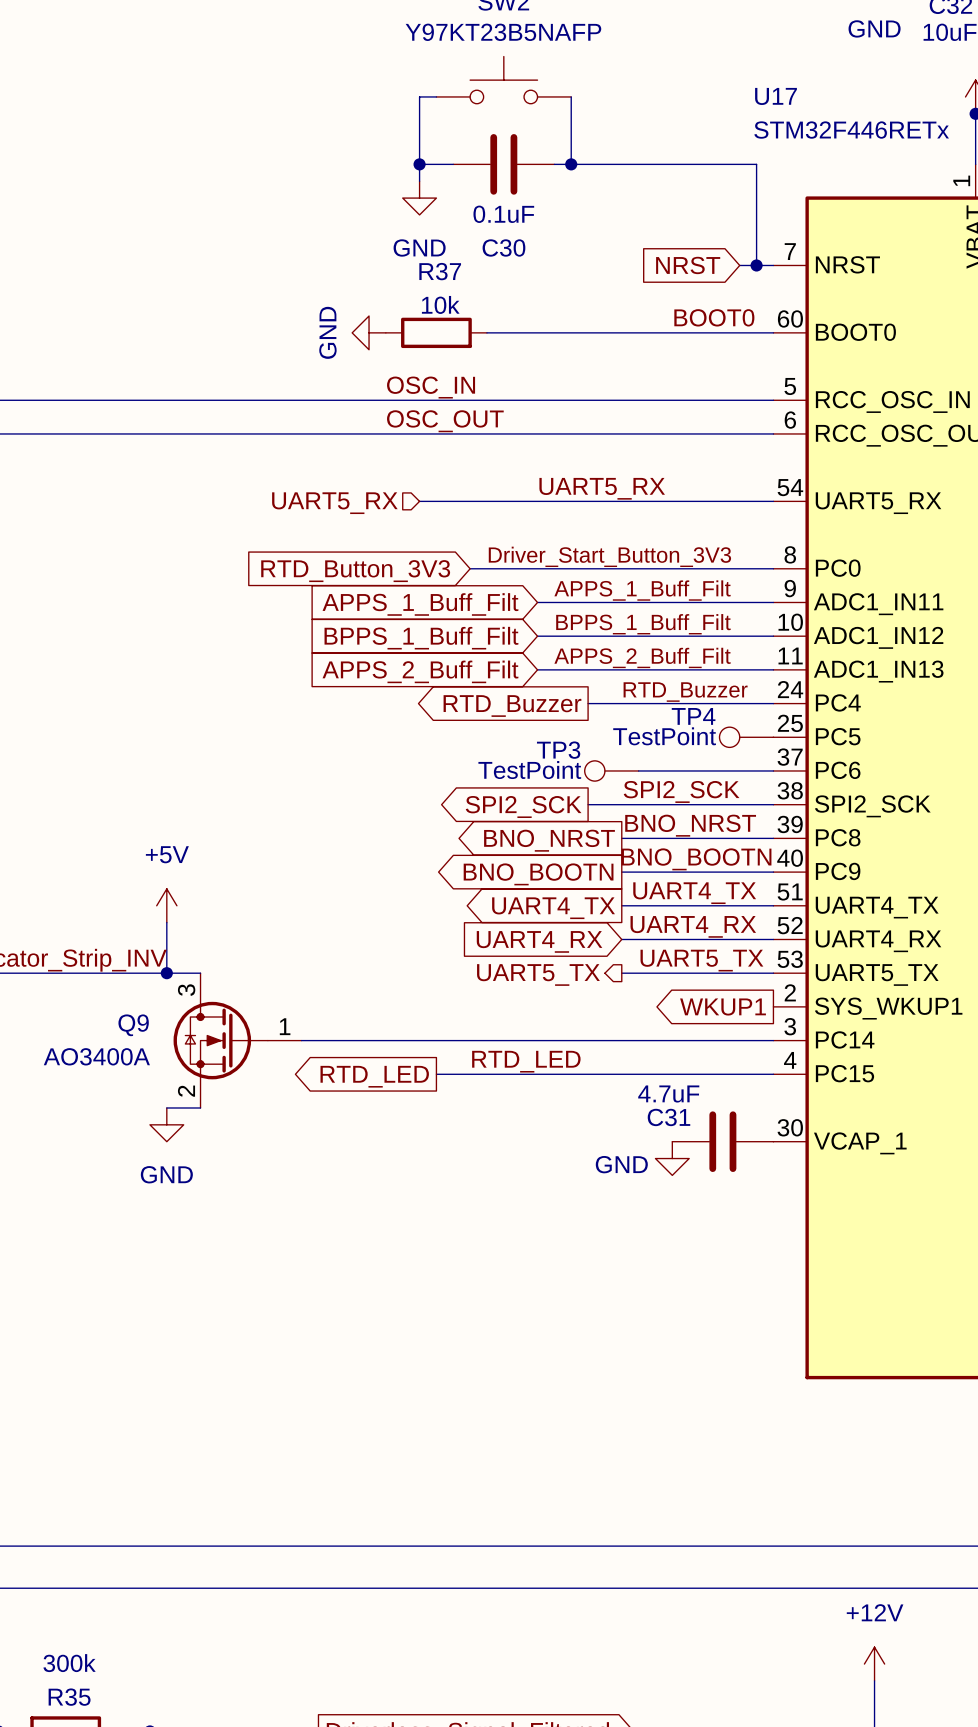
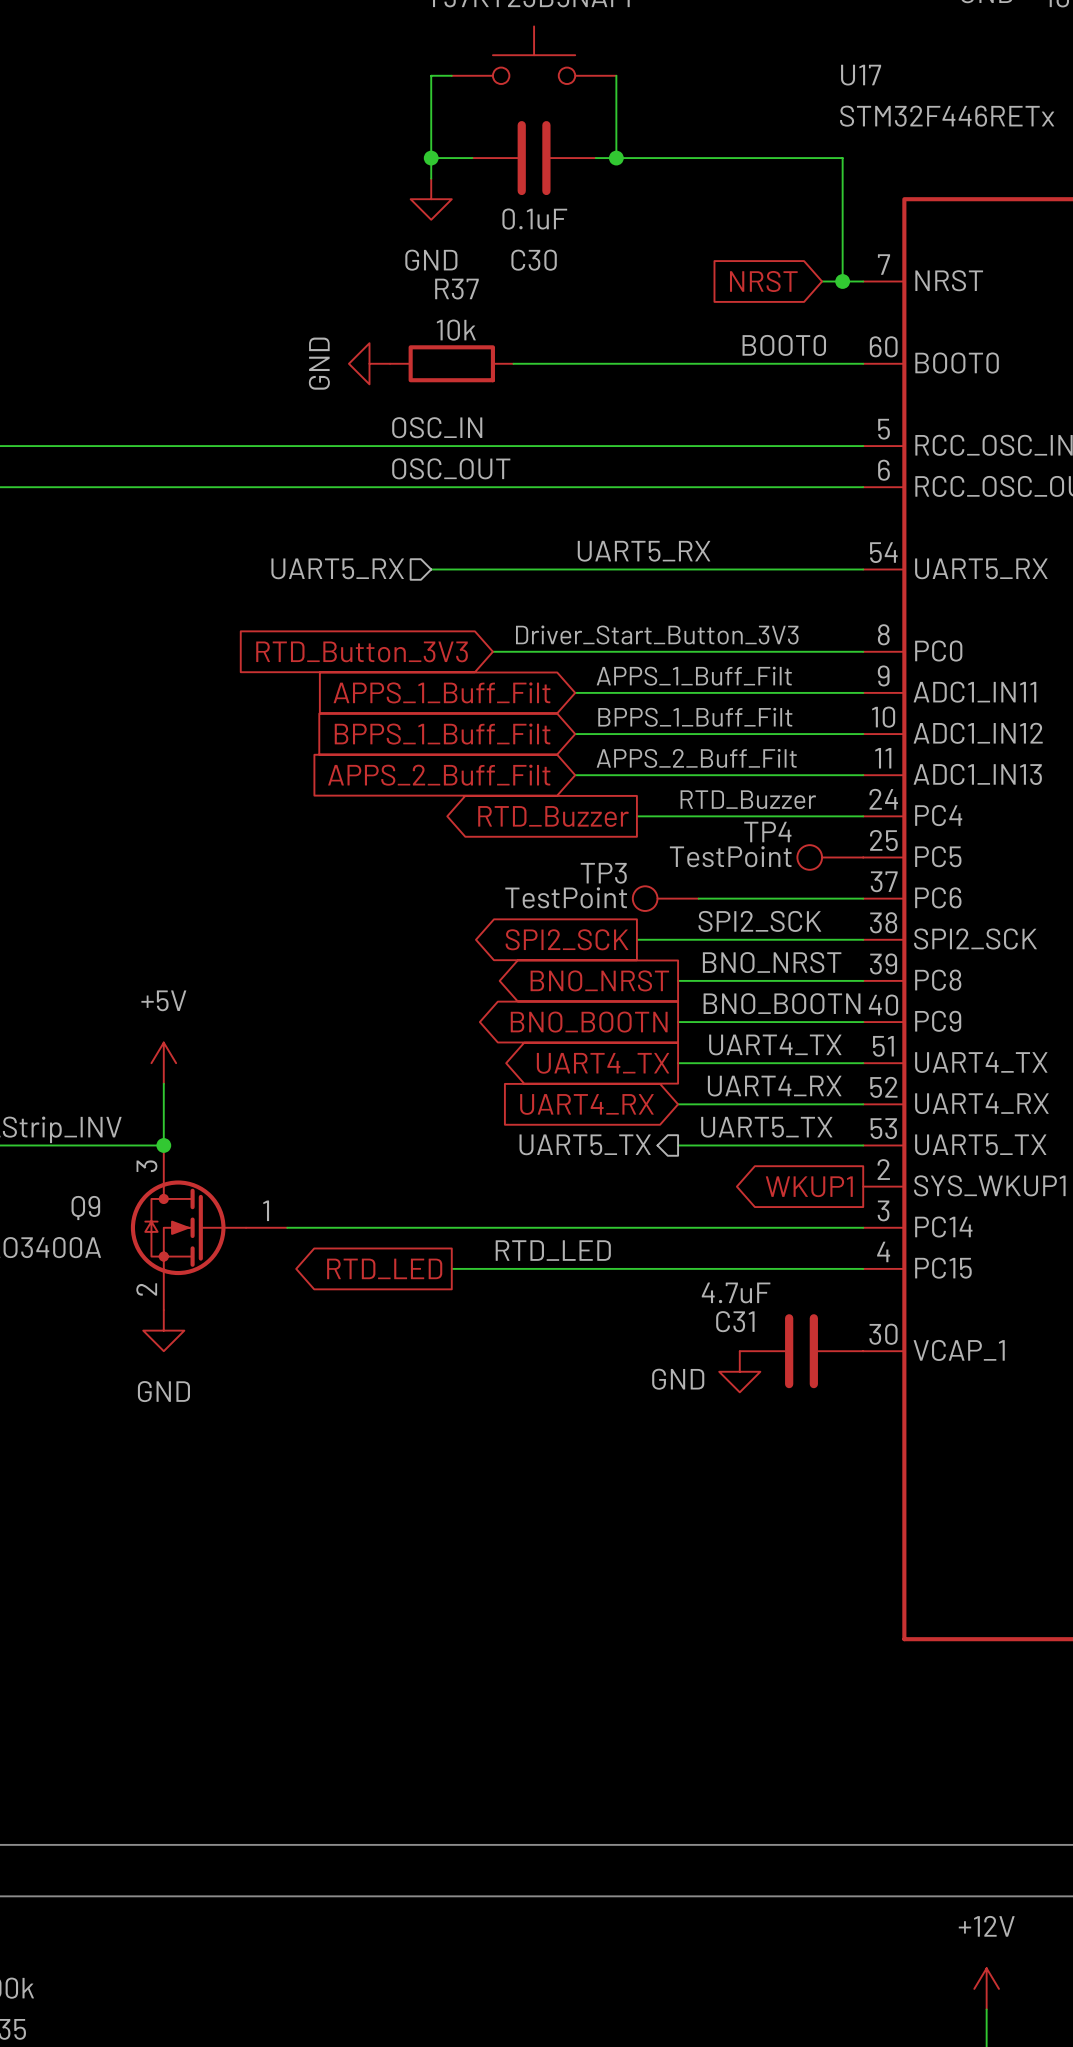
power symbol position: +5V (166, 905) -> +5V (163, 1063)
wire: (166, 922) (166, 973) -> (163, 1083) (163, 1145)
junction position: (166, 973) -> (163, 1145)
wire: (166, 1107) (200, 1107) -> none
power symbol position: GND (166, 1124) -> GND (163, 1330)

